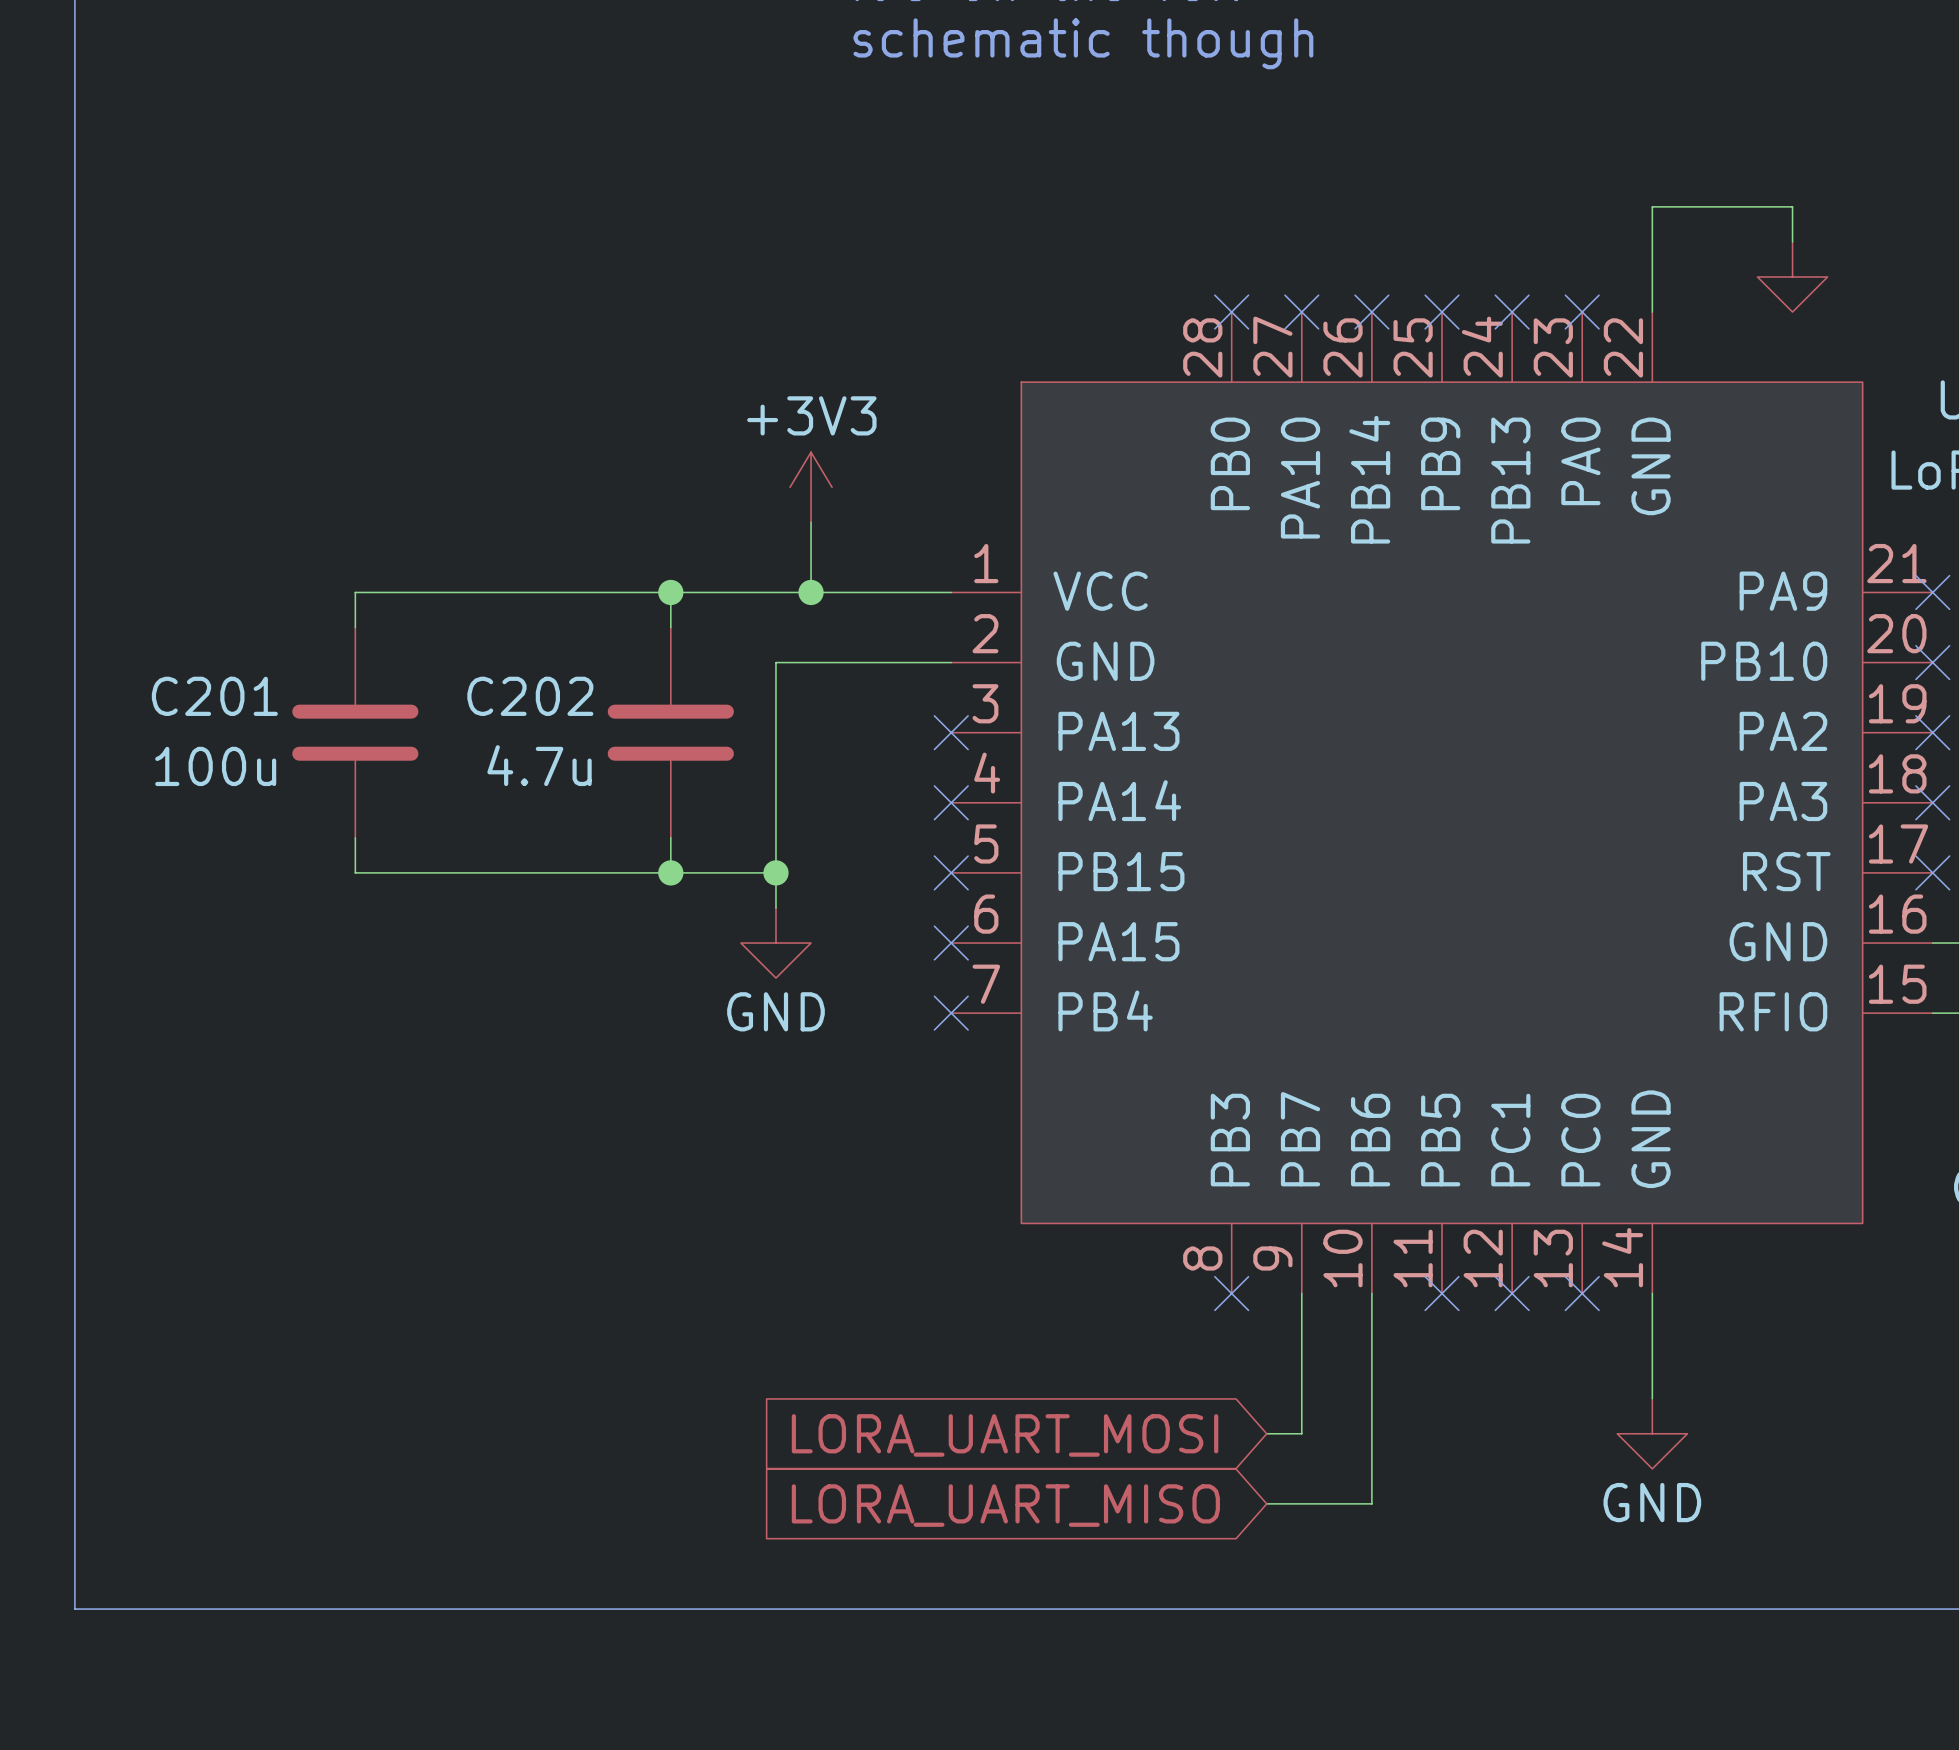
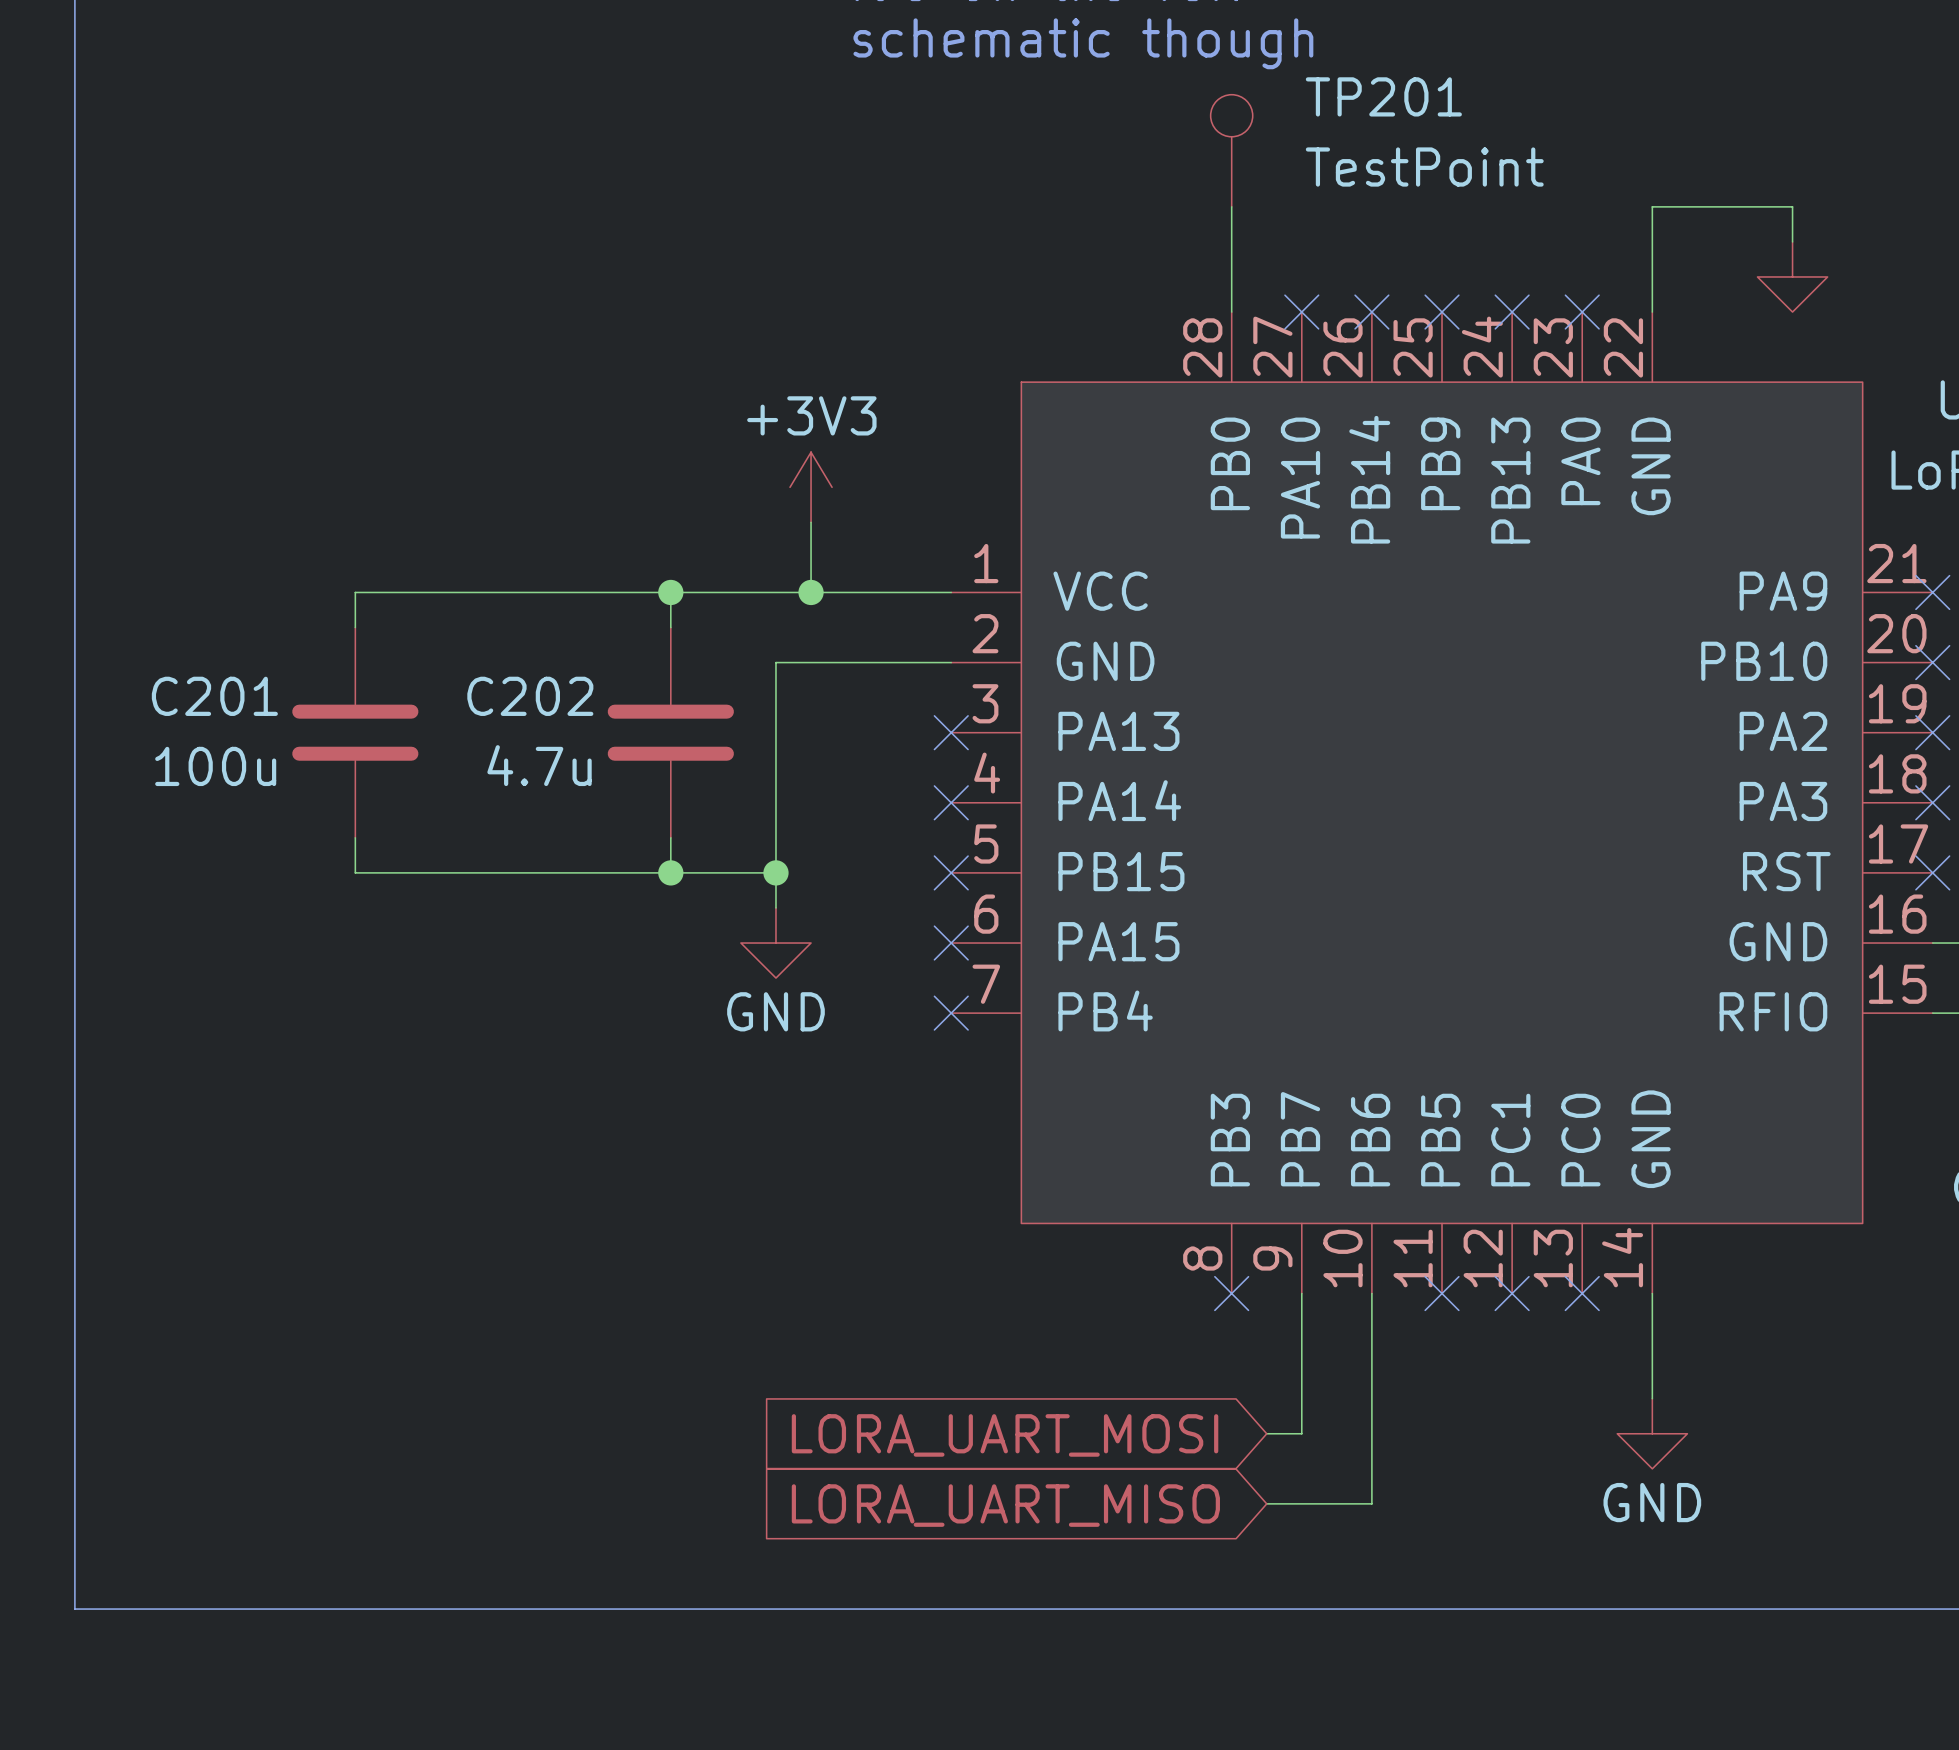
TP201: none -> TestPoint (1231, 150)
wire: none -> (1231, 206) (1231, 312)
no-connect mark: (1231, 312) -> none

